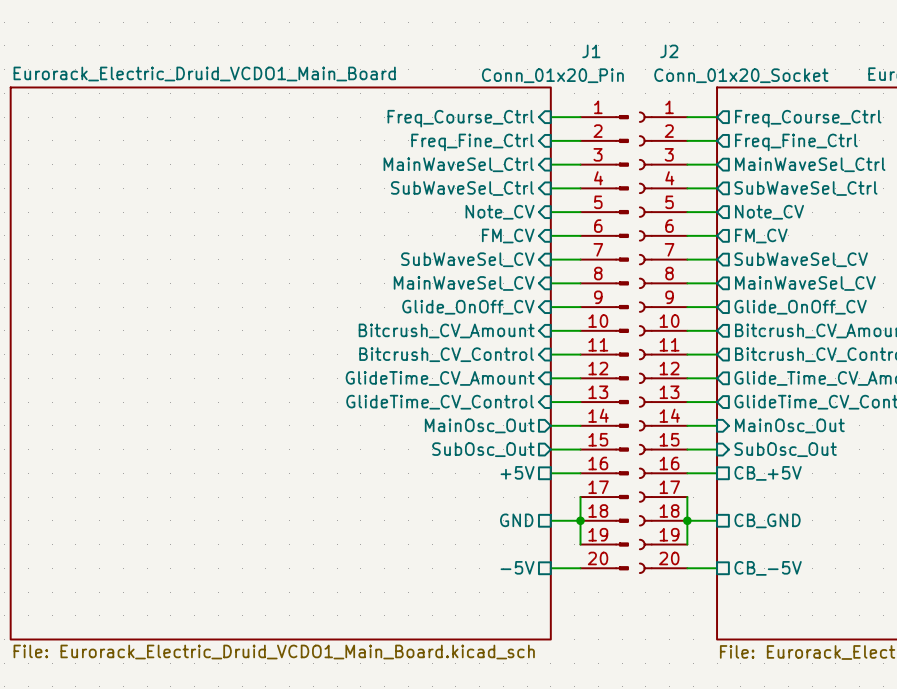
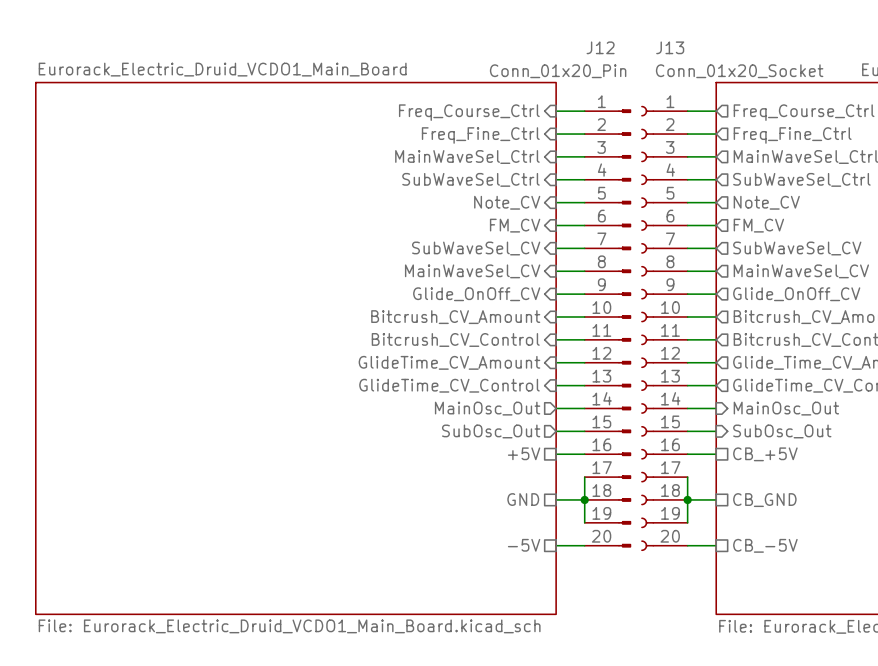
J1 name: J1 (591, 51) -> J12 (600, 47)
J2 name: J2 (669, 51) -> J13 (670, 47)

